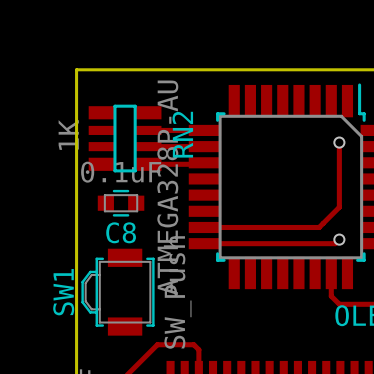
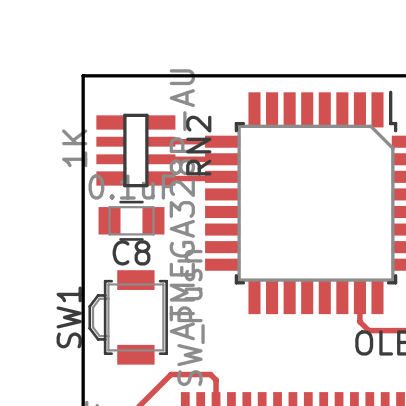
track: (339, 142) (339, 207) (319, 227) (204, 227) -> none
via: (339, 142) -> none
C8 footprint: [97, 189, 145, 217] -> [98, 200, 165, 241]
track: (339, 239) (335, 243) (204, 243) -> none
via: (339, 239) -> none

